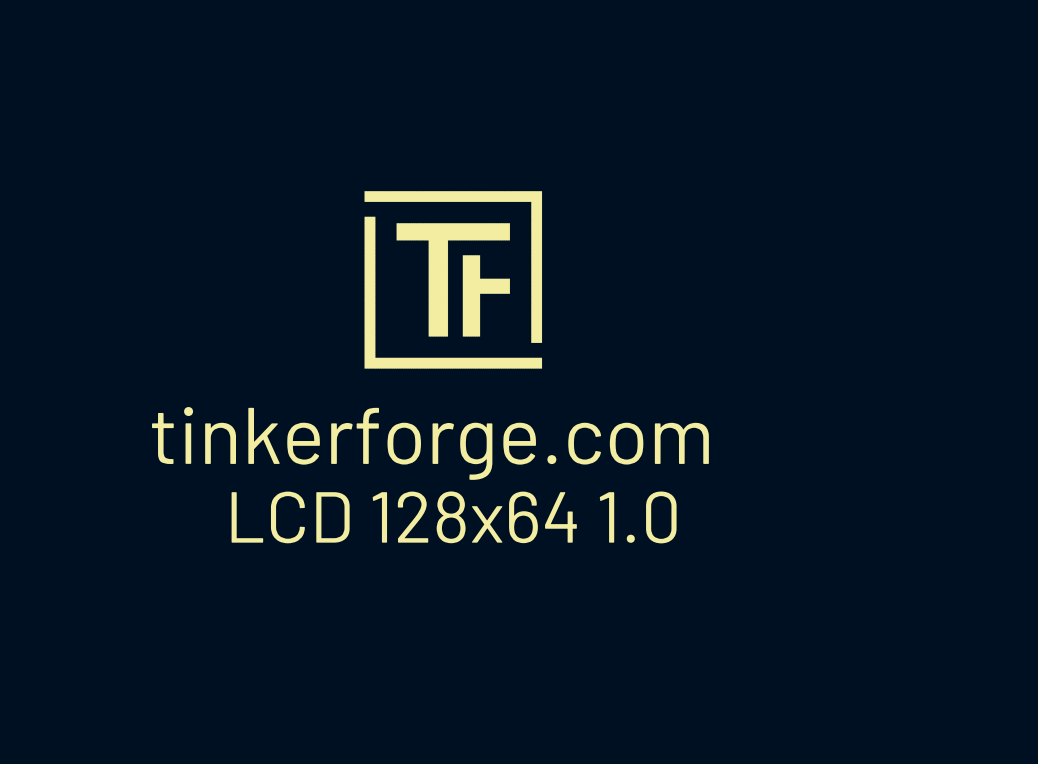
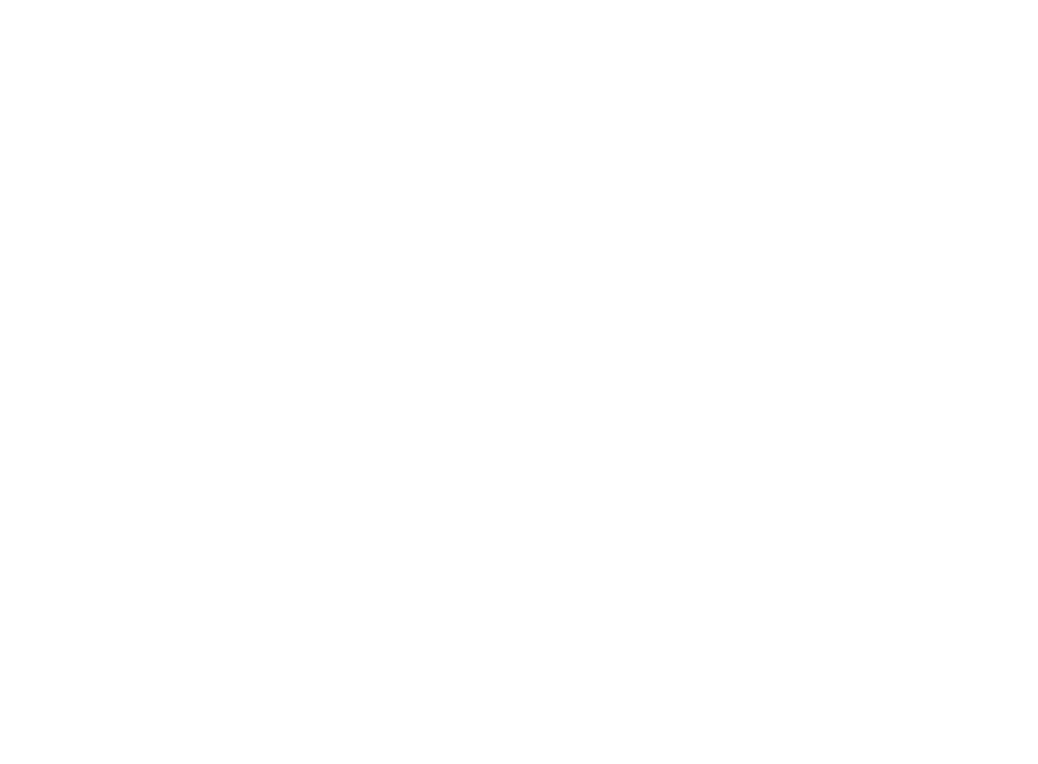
drawing: [364, 191, 543, 369] -> none
text: tinkerforge.com (430, 443) -> none
text: LCD 128x64 1.0 (454, 517) -> none

